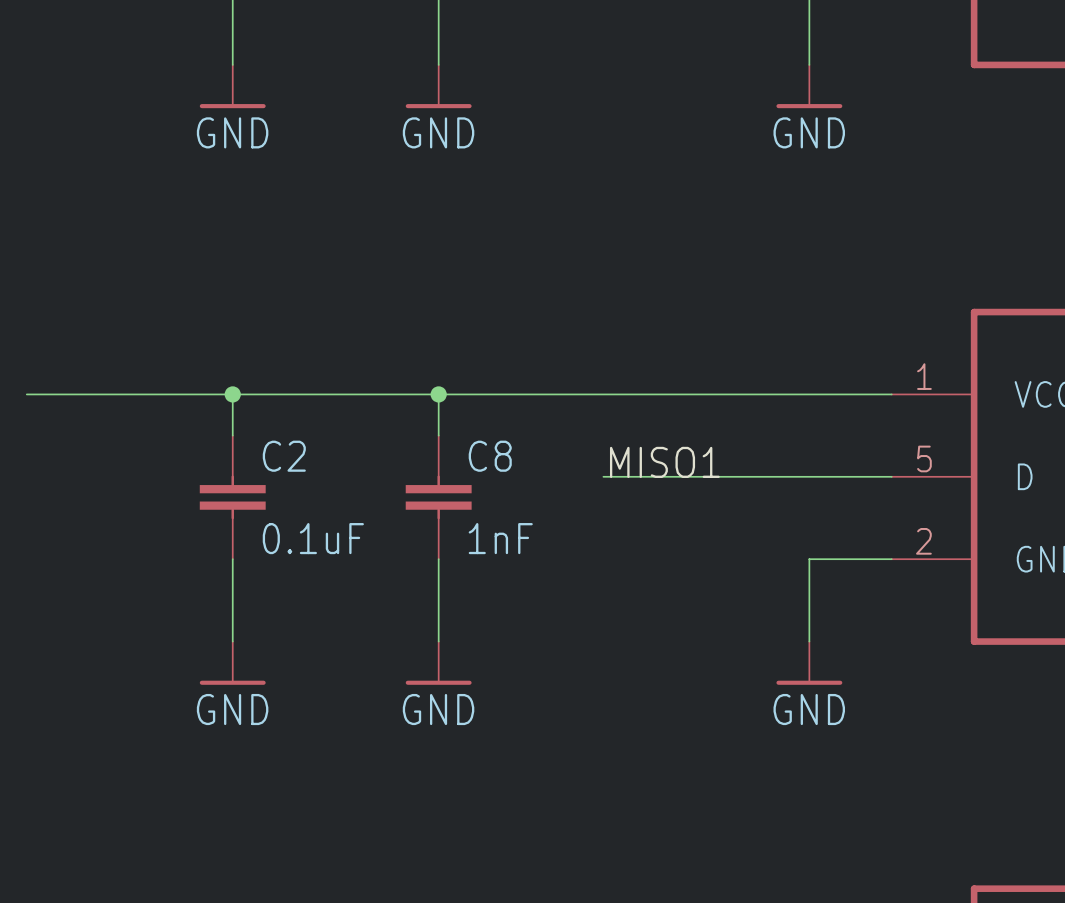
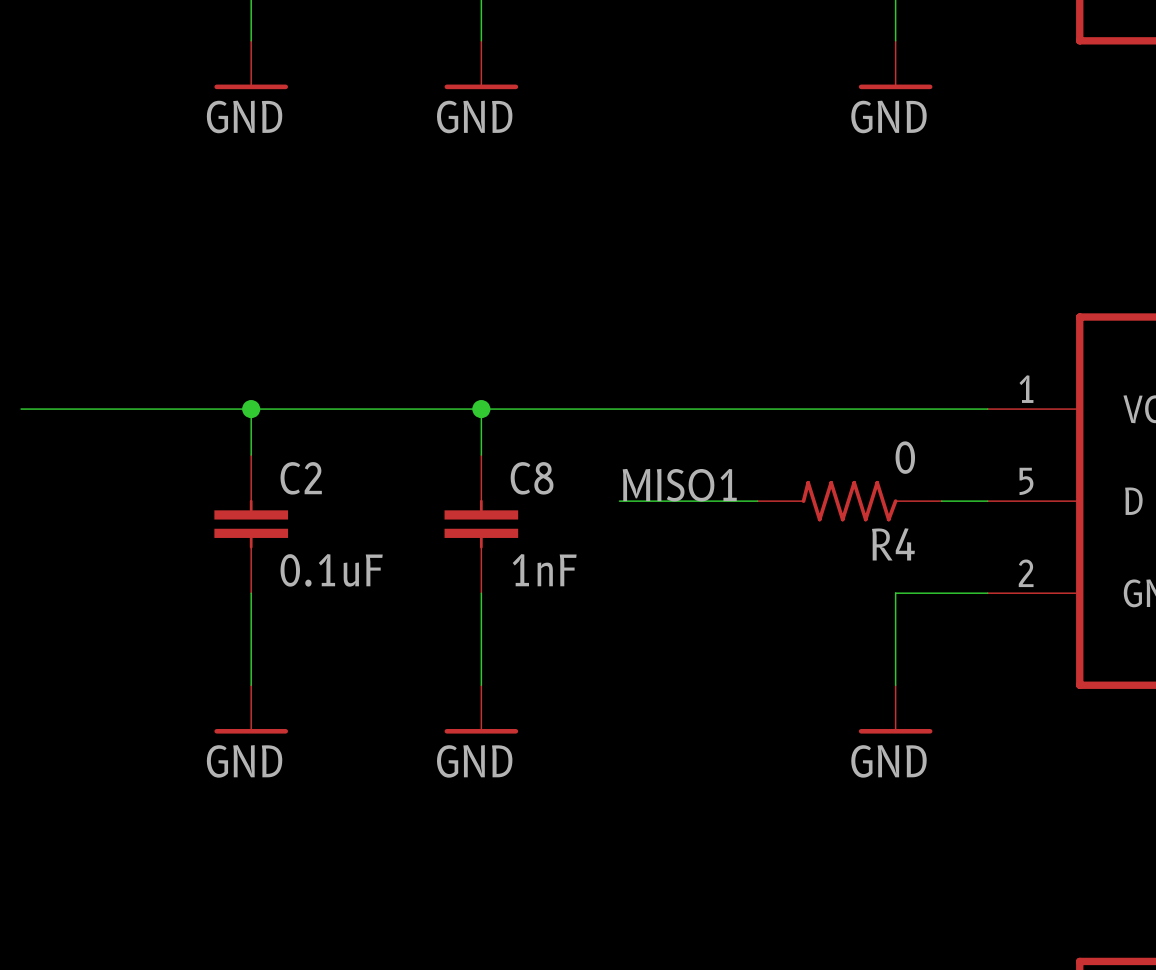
label position: MISO1 (664, 462) -> MISO1 (679, 485)
wire: none -> (619, 501) (665, 501)
R4: none -> 0 (849, 501)

